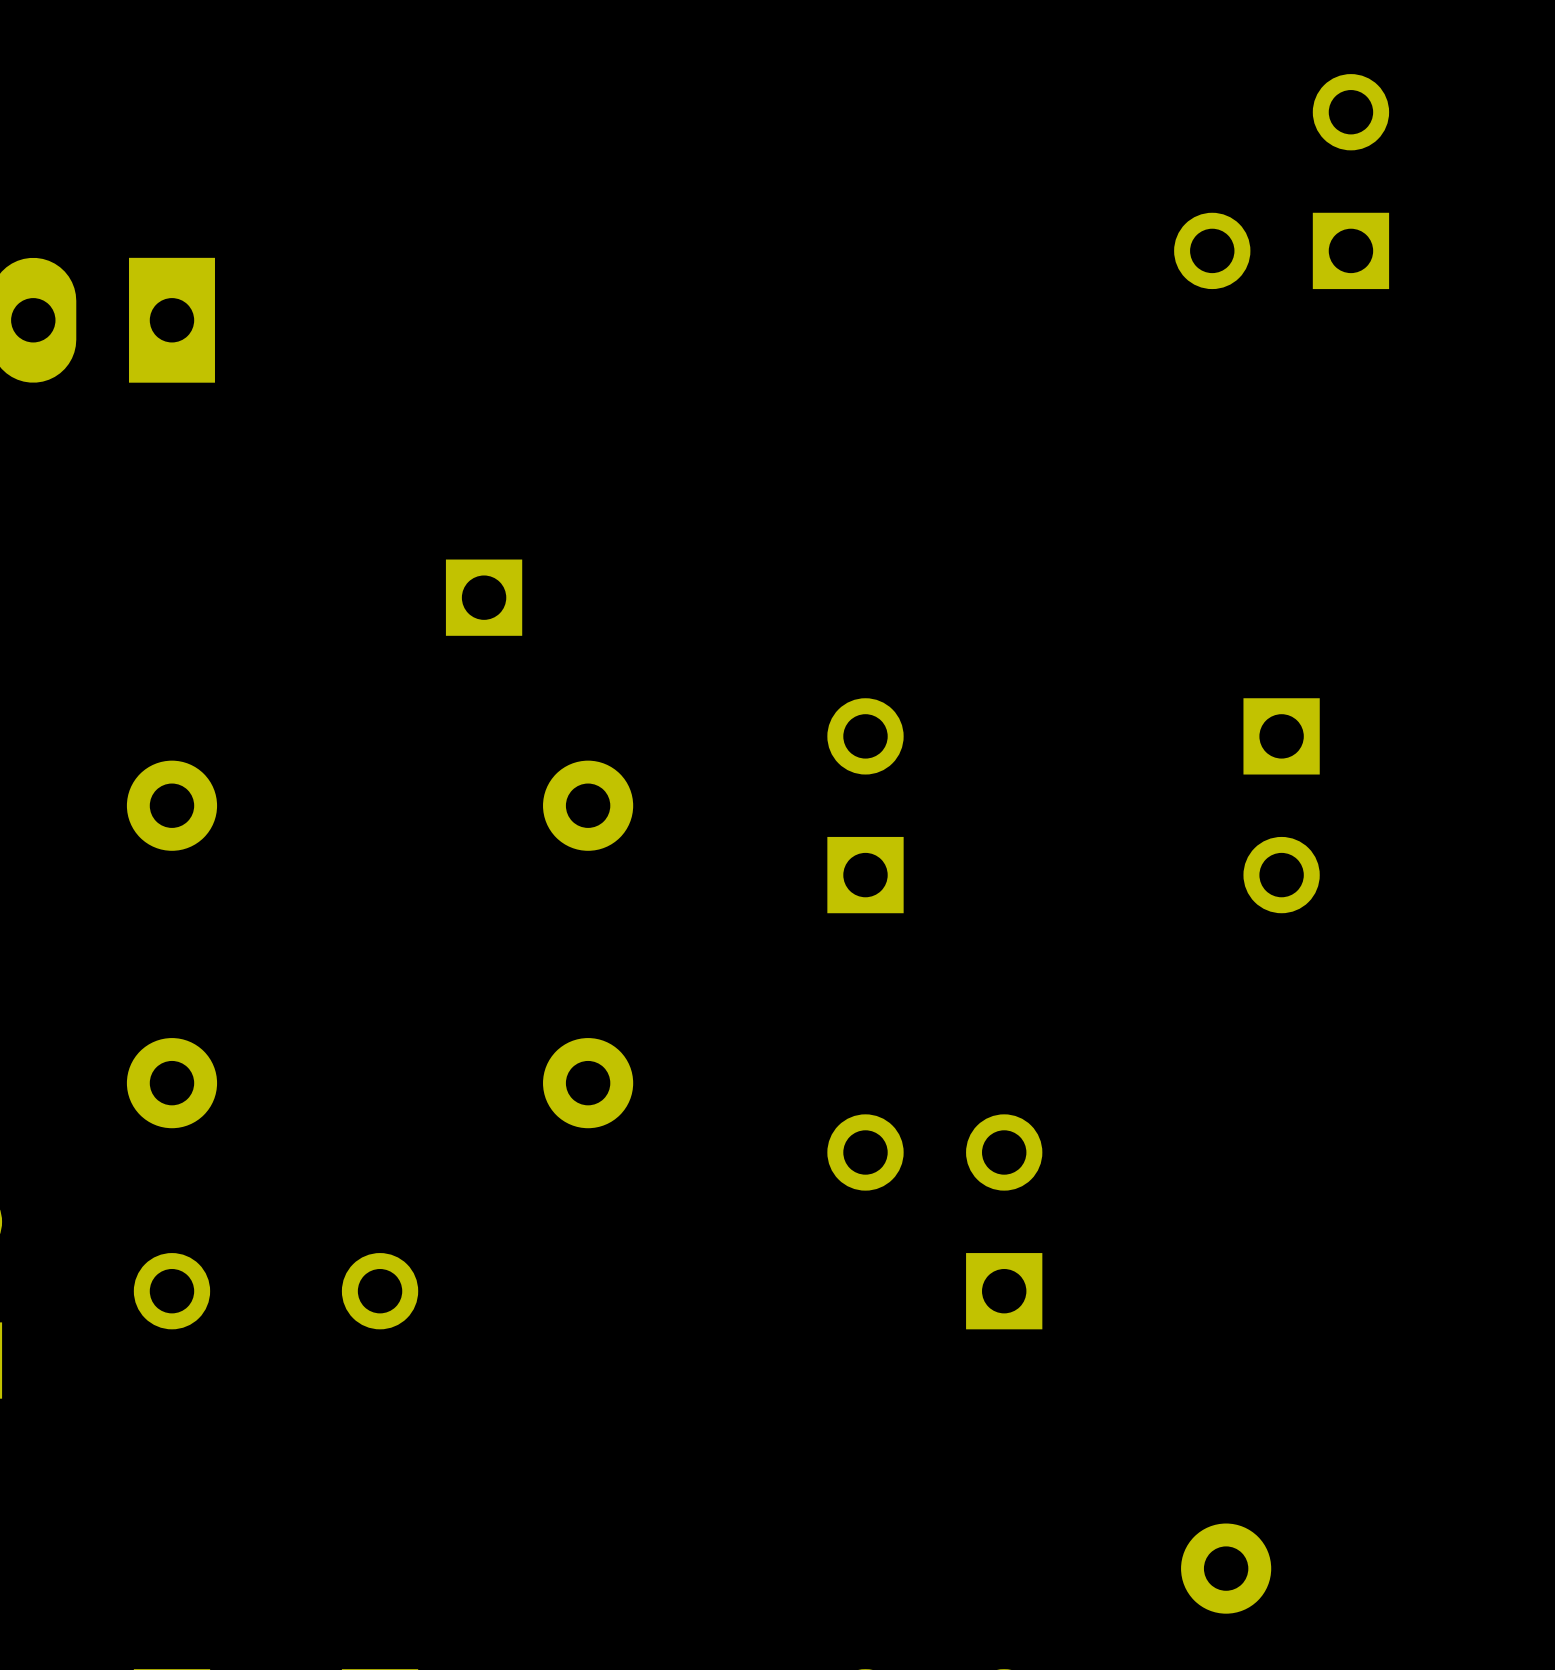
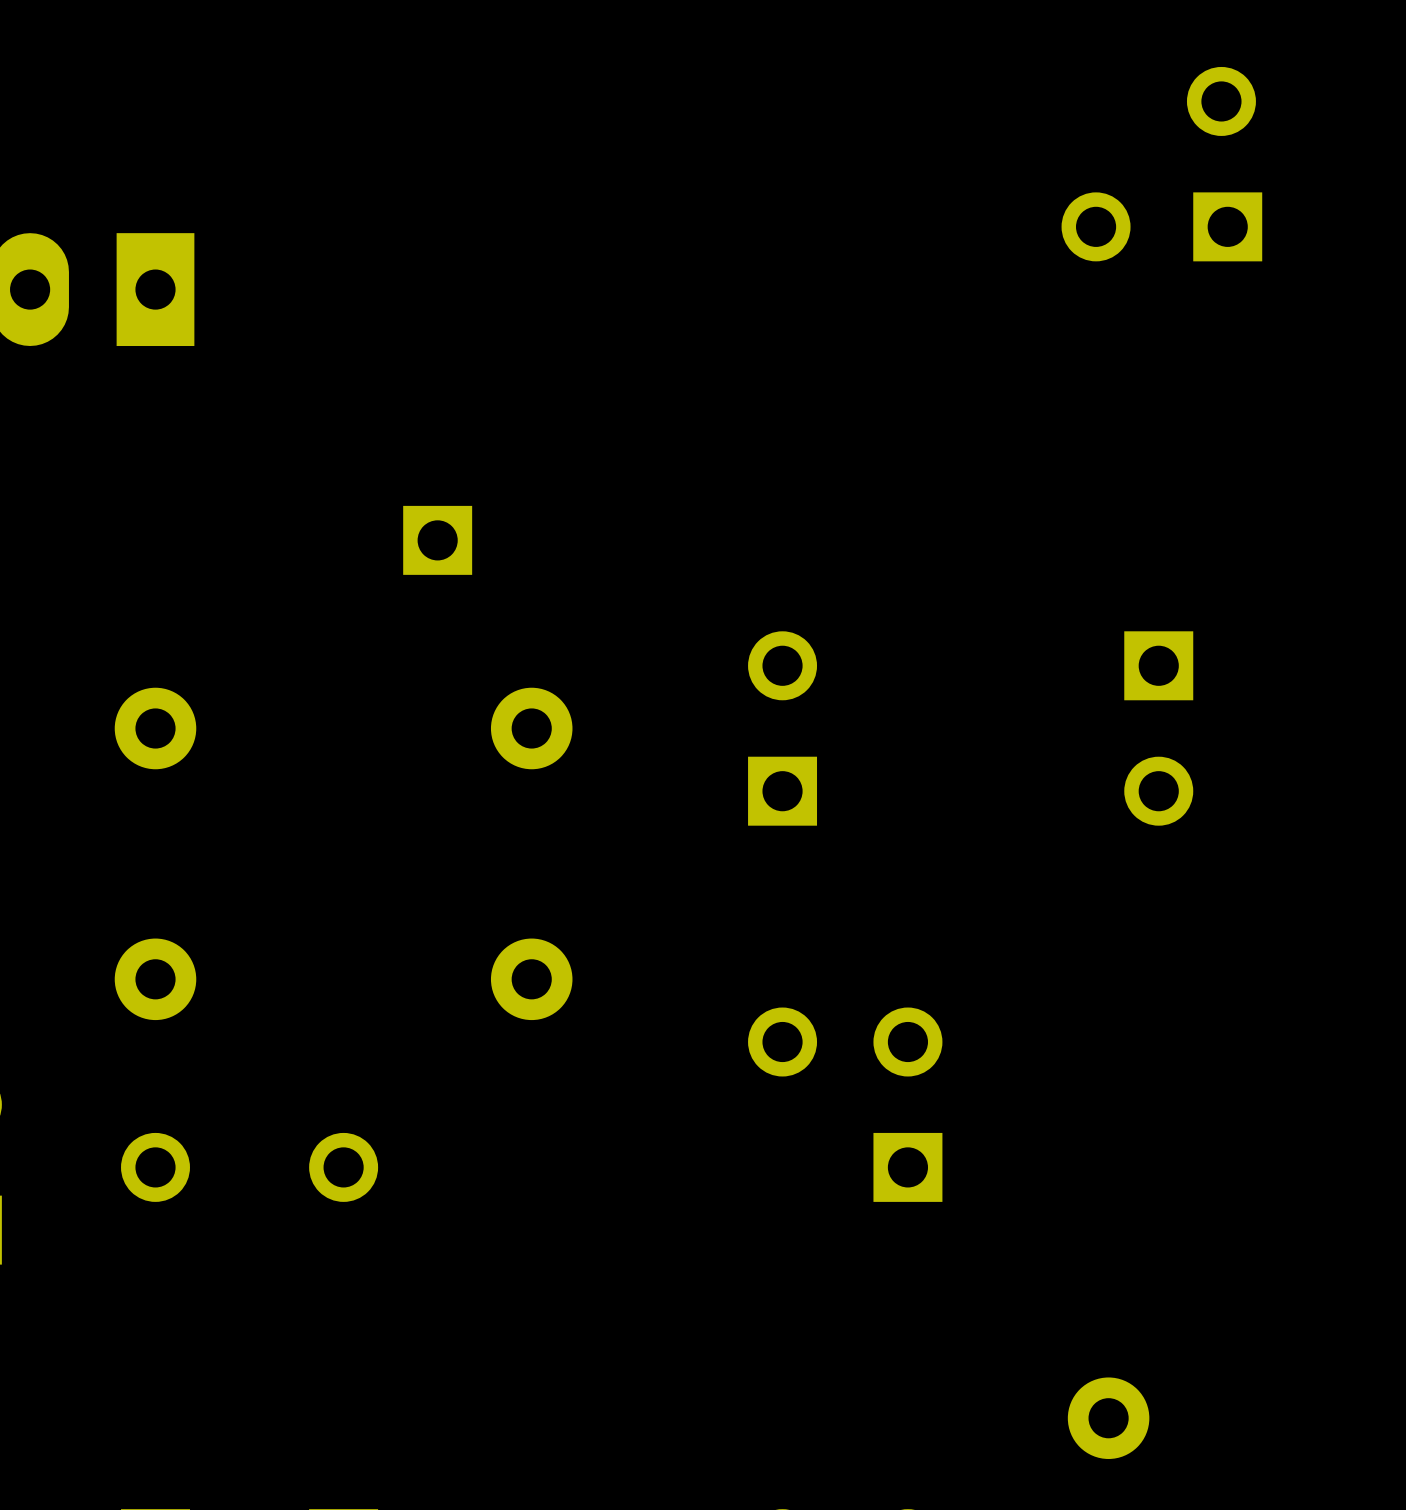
part footprint: [1174, 74, 1390, 290] -> [1061, 66, 1263, 262]

